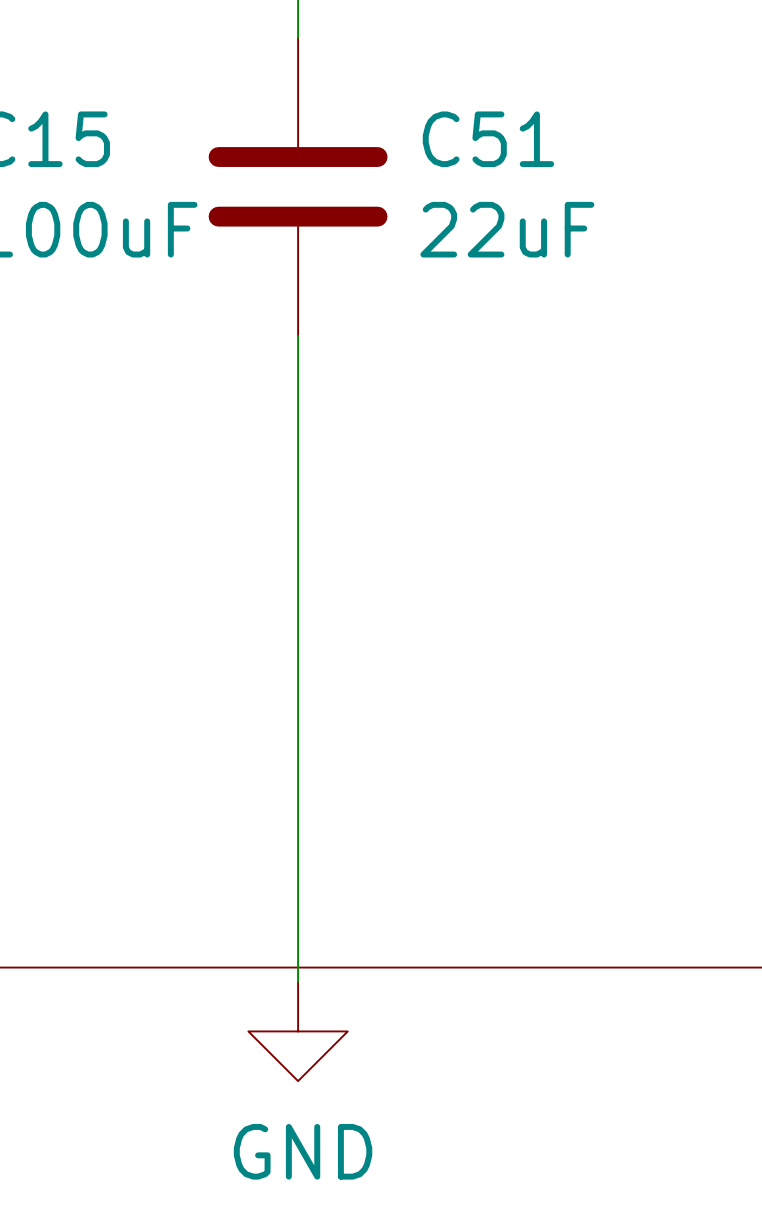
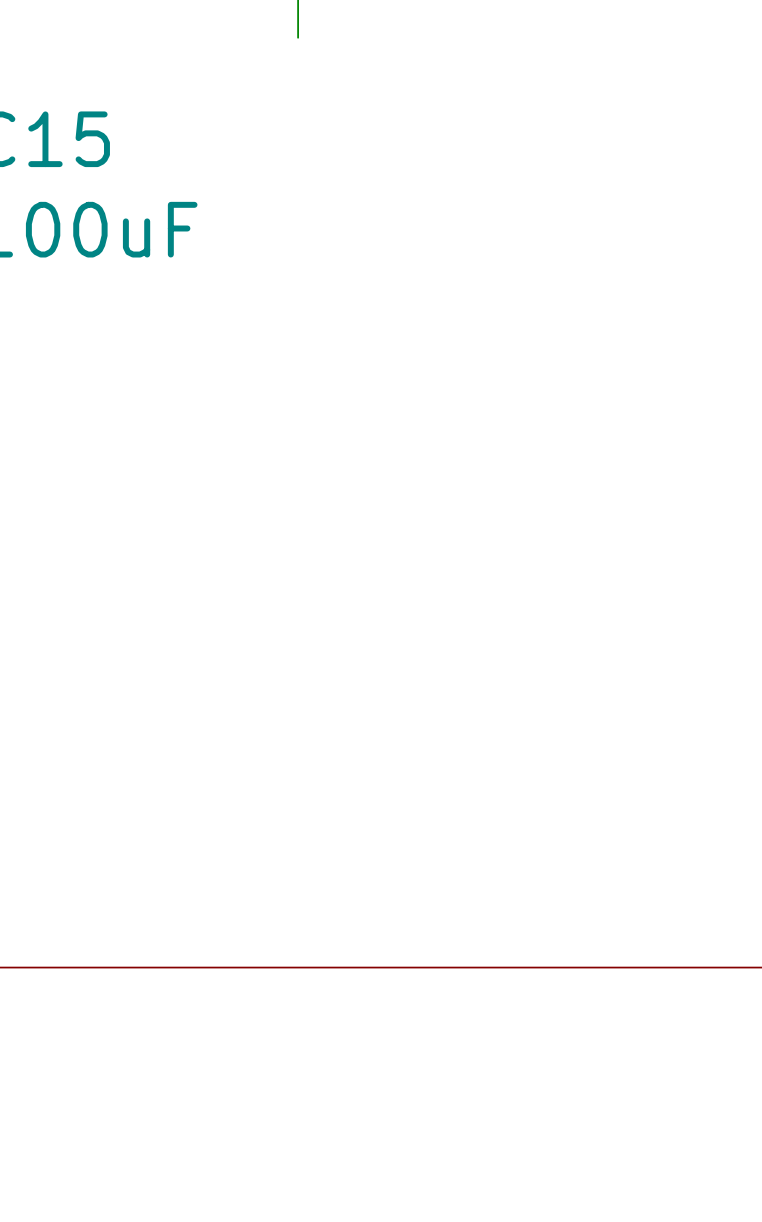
C51: 22uF (298, 186) -> none
wire: (298, 335) (298, 981) -> none
power symbol: GND (298, 1031) -> none

